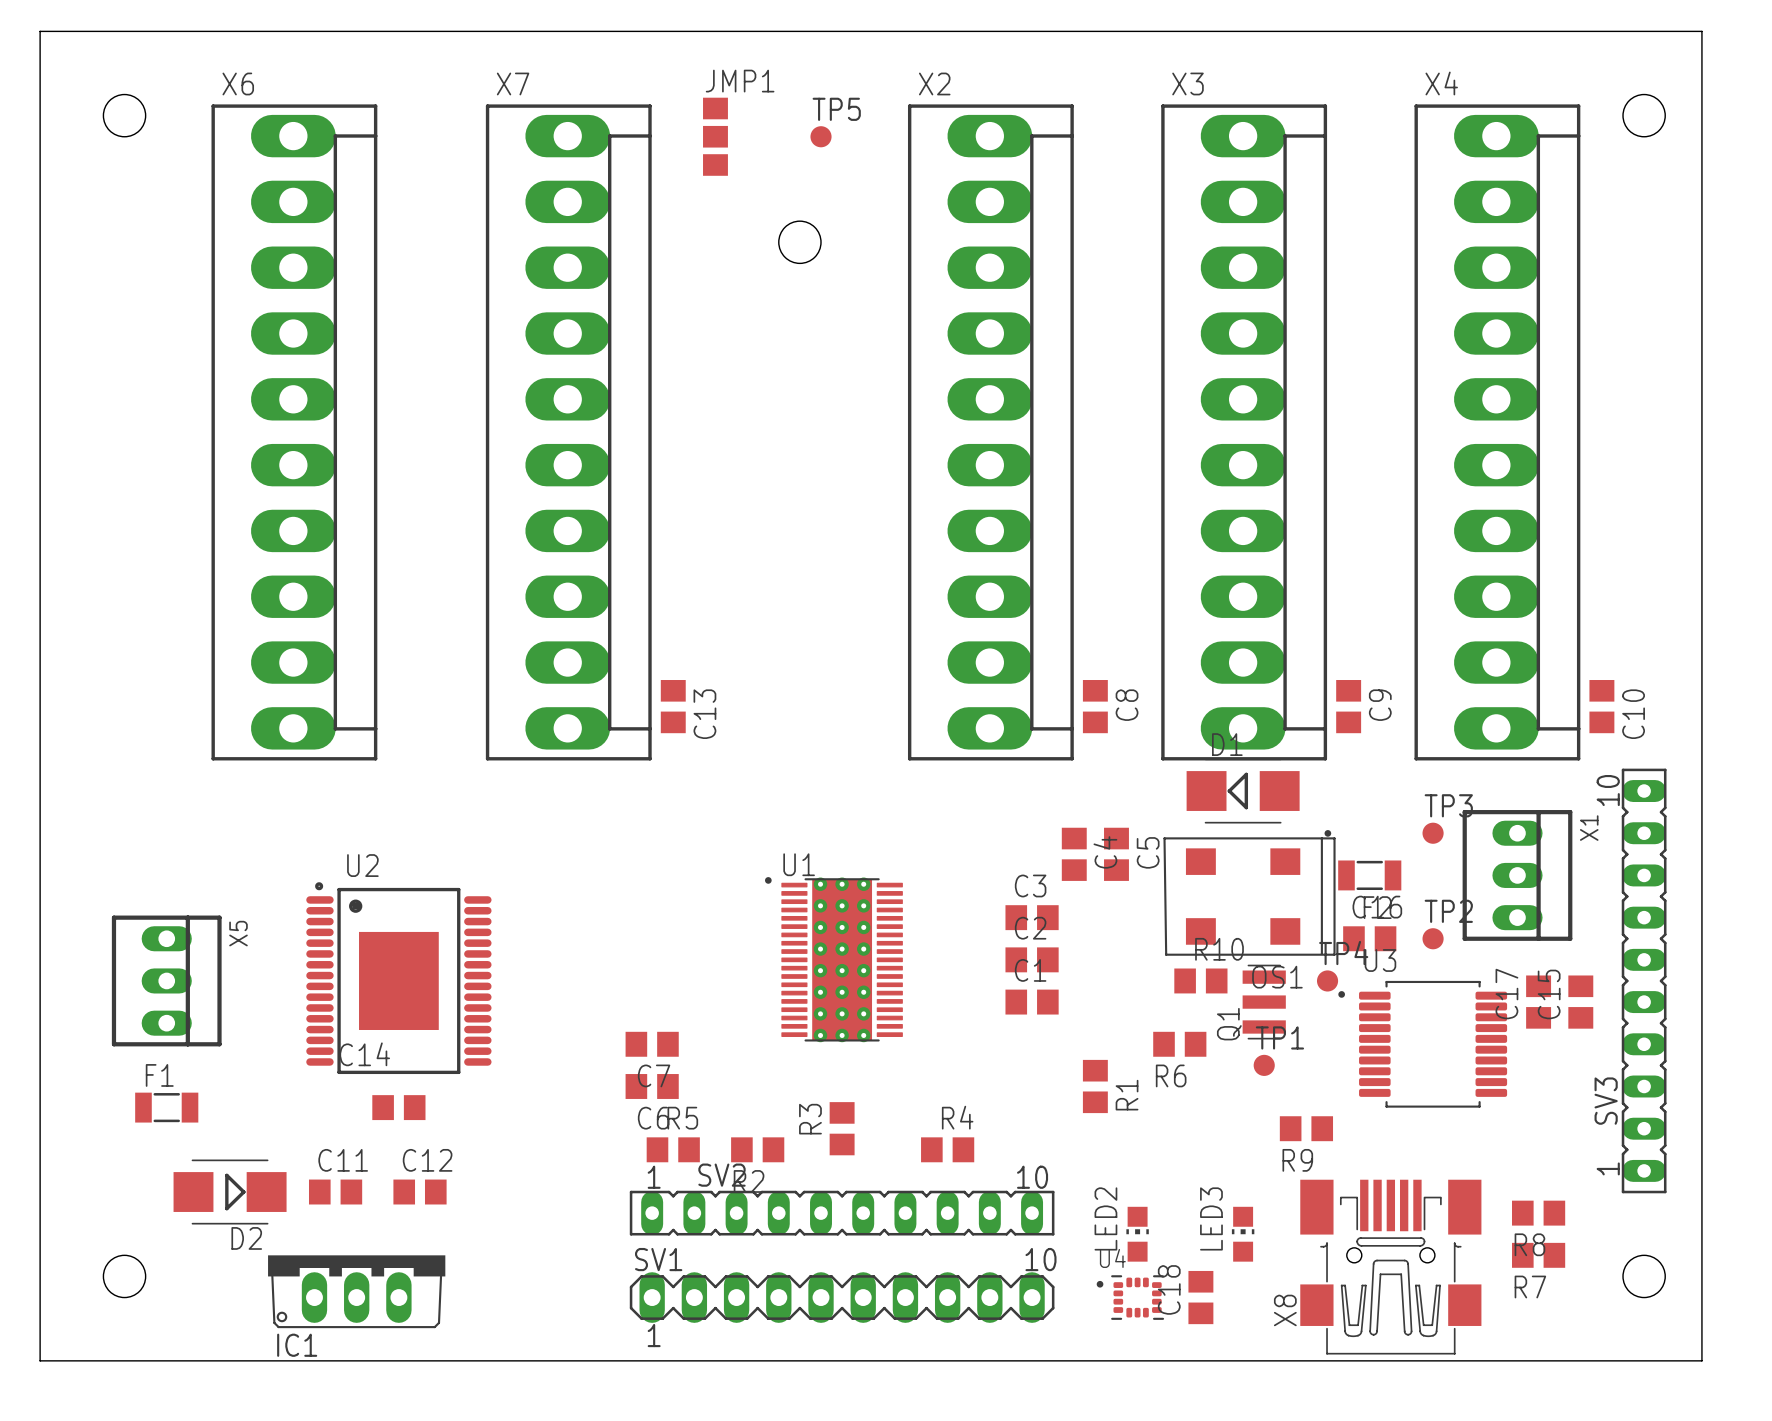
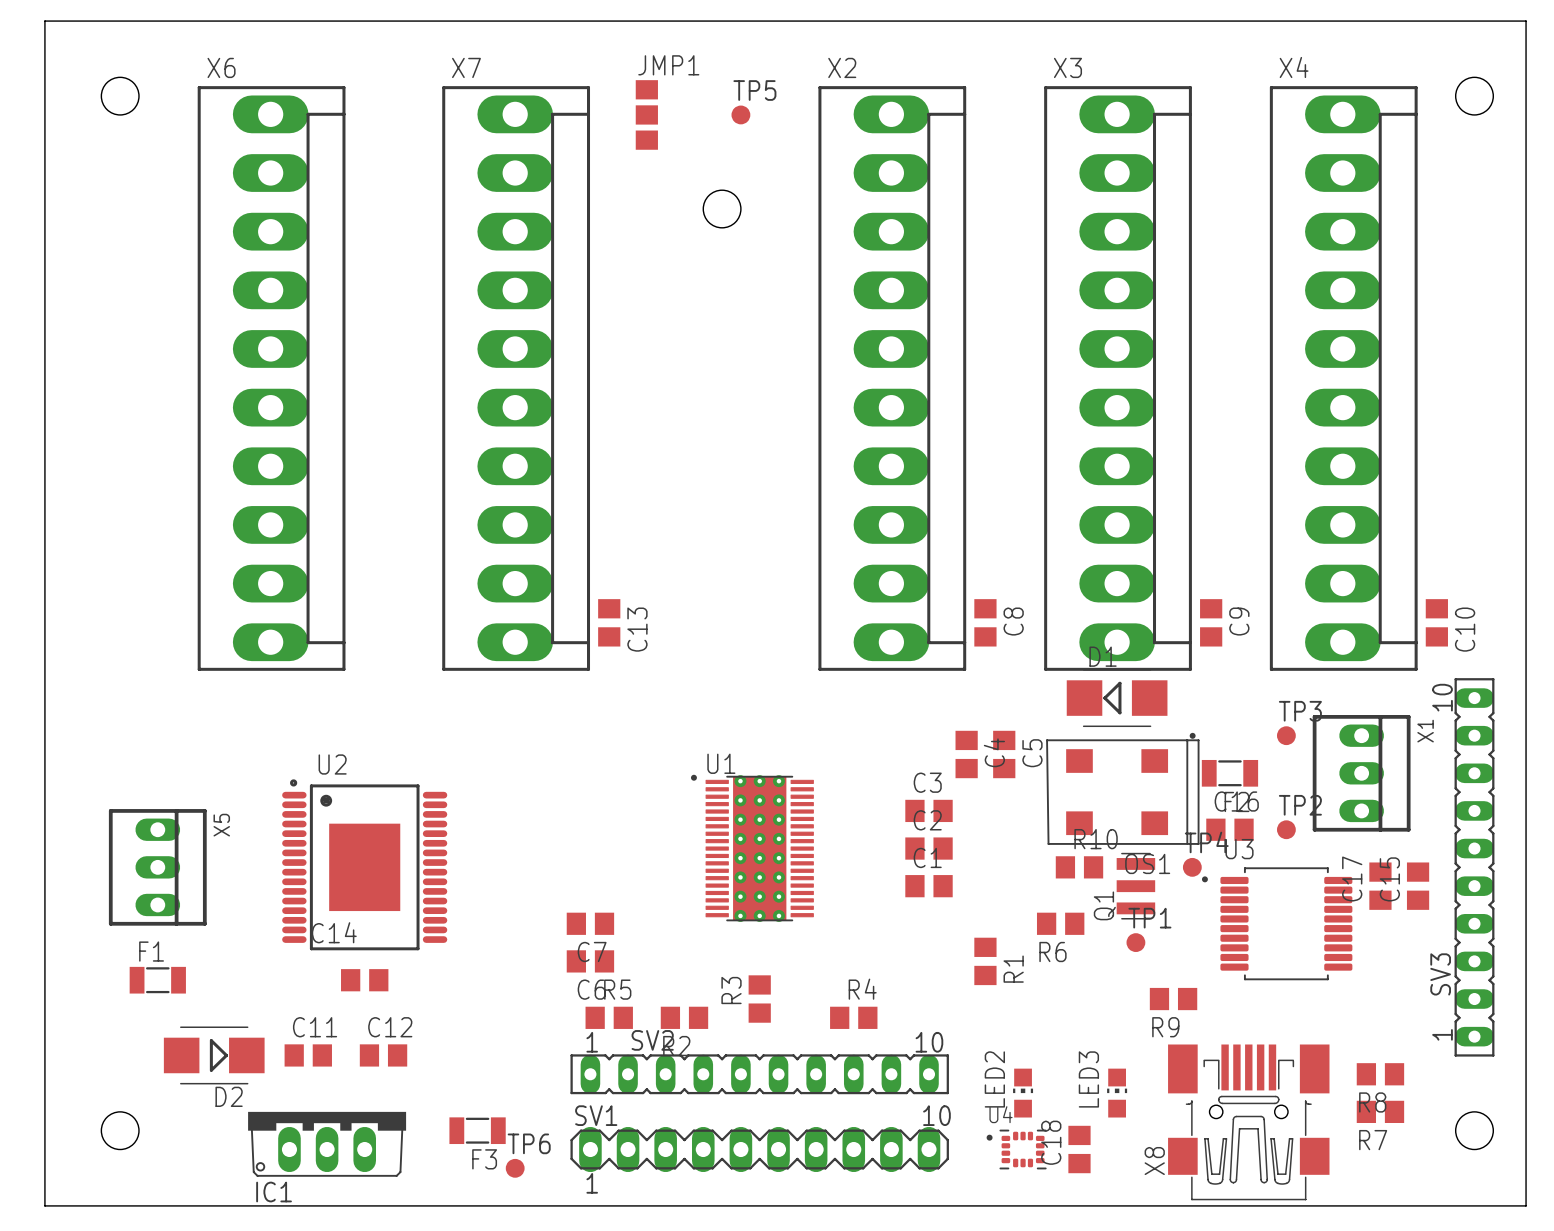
F3: none -> (477, 1130)
TP6: none -> (515, 1168)

